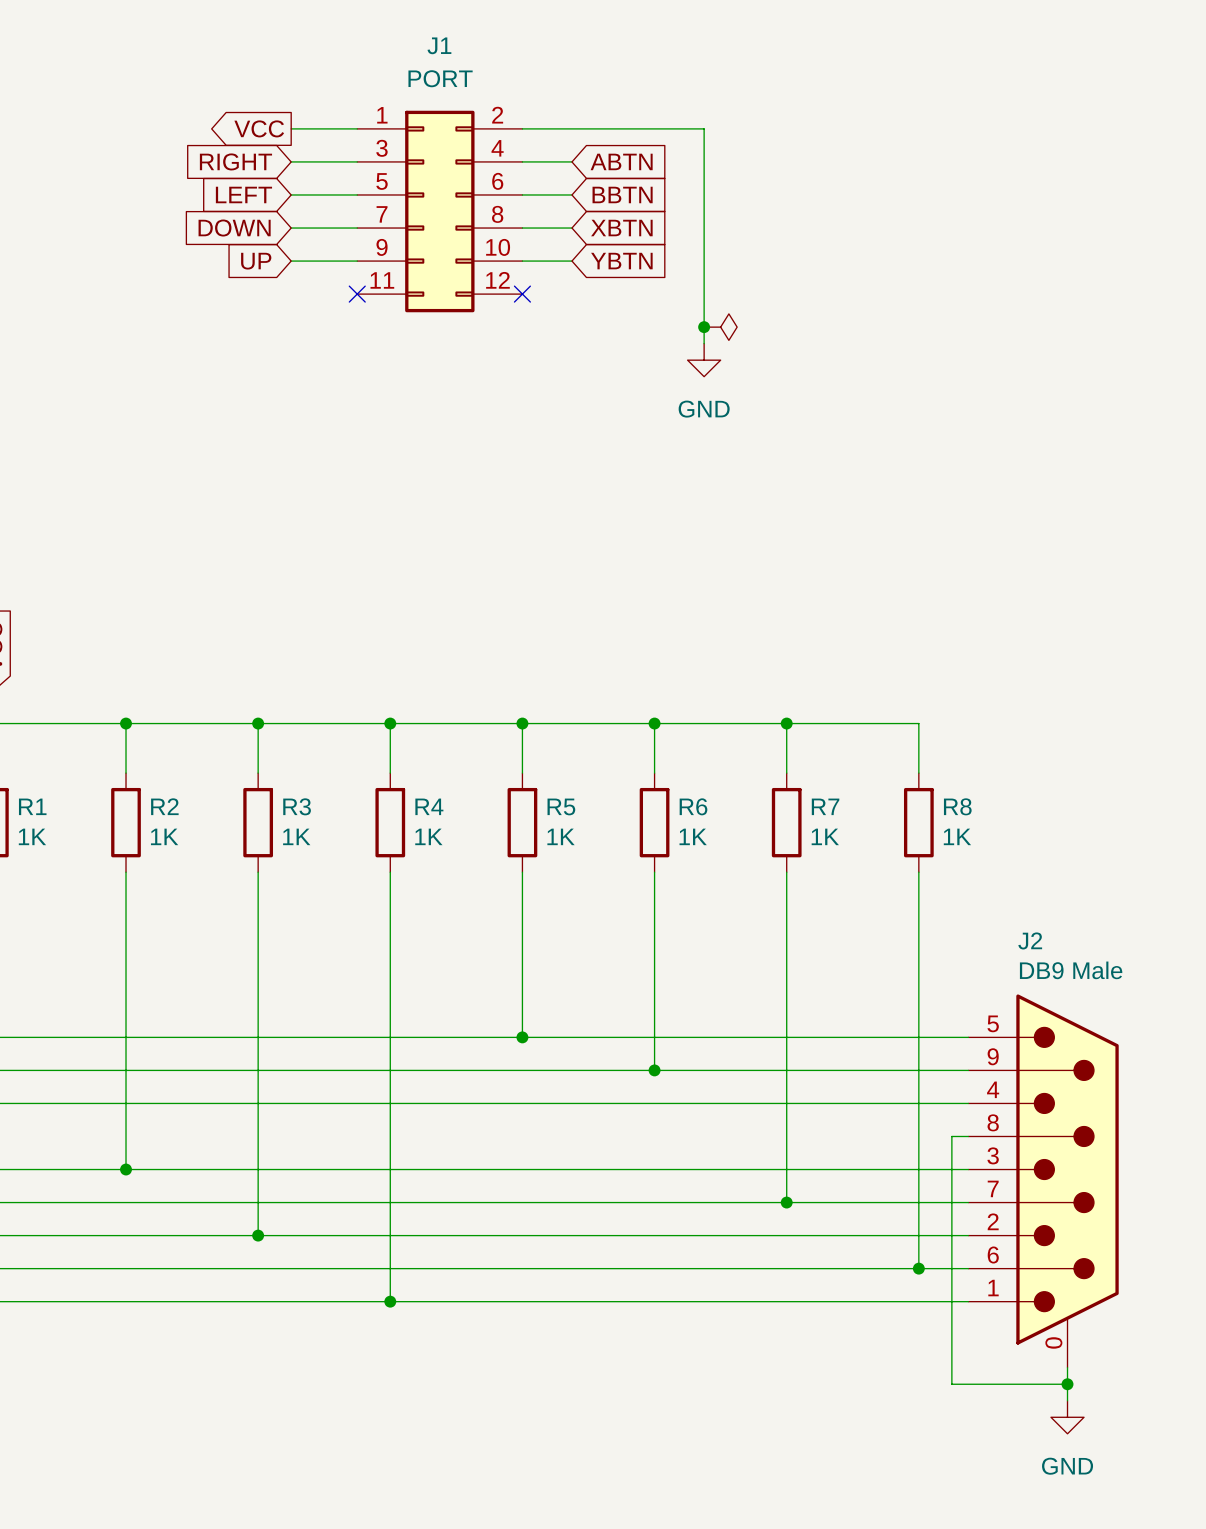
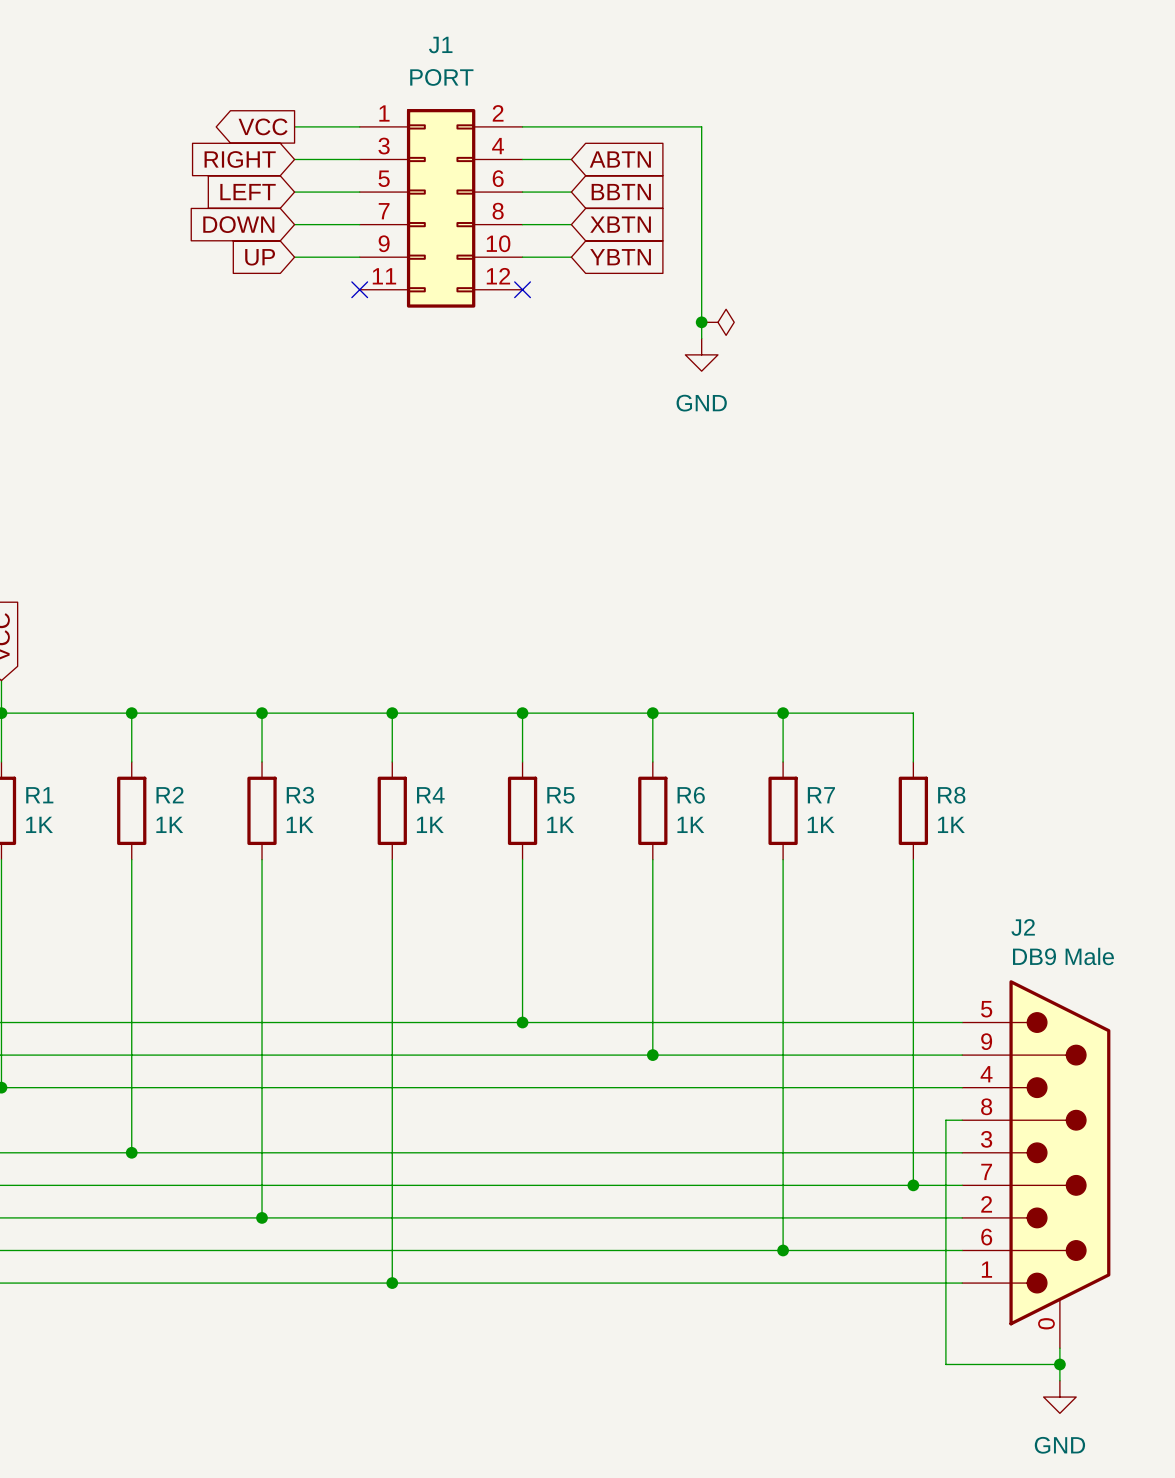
junction: (786, 1202) -> none
wire: (918, 1202) (918, 1268) -> (783, 1185) (783, 1250)
junction: none -> (913, 1185)
junction: none -> (783, 1250)
junction: (918, 1268) -> none

